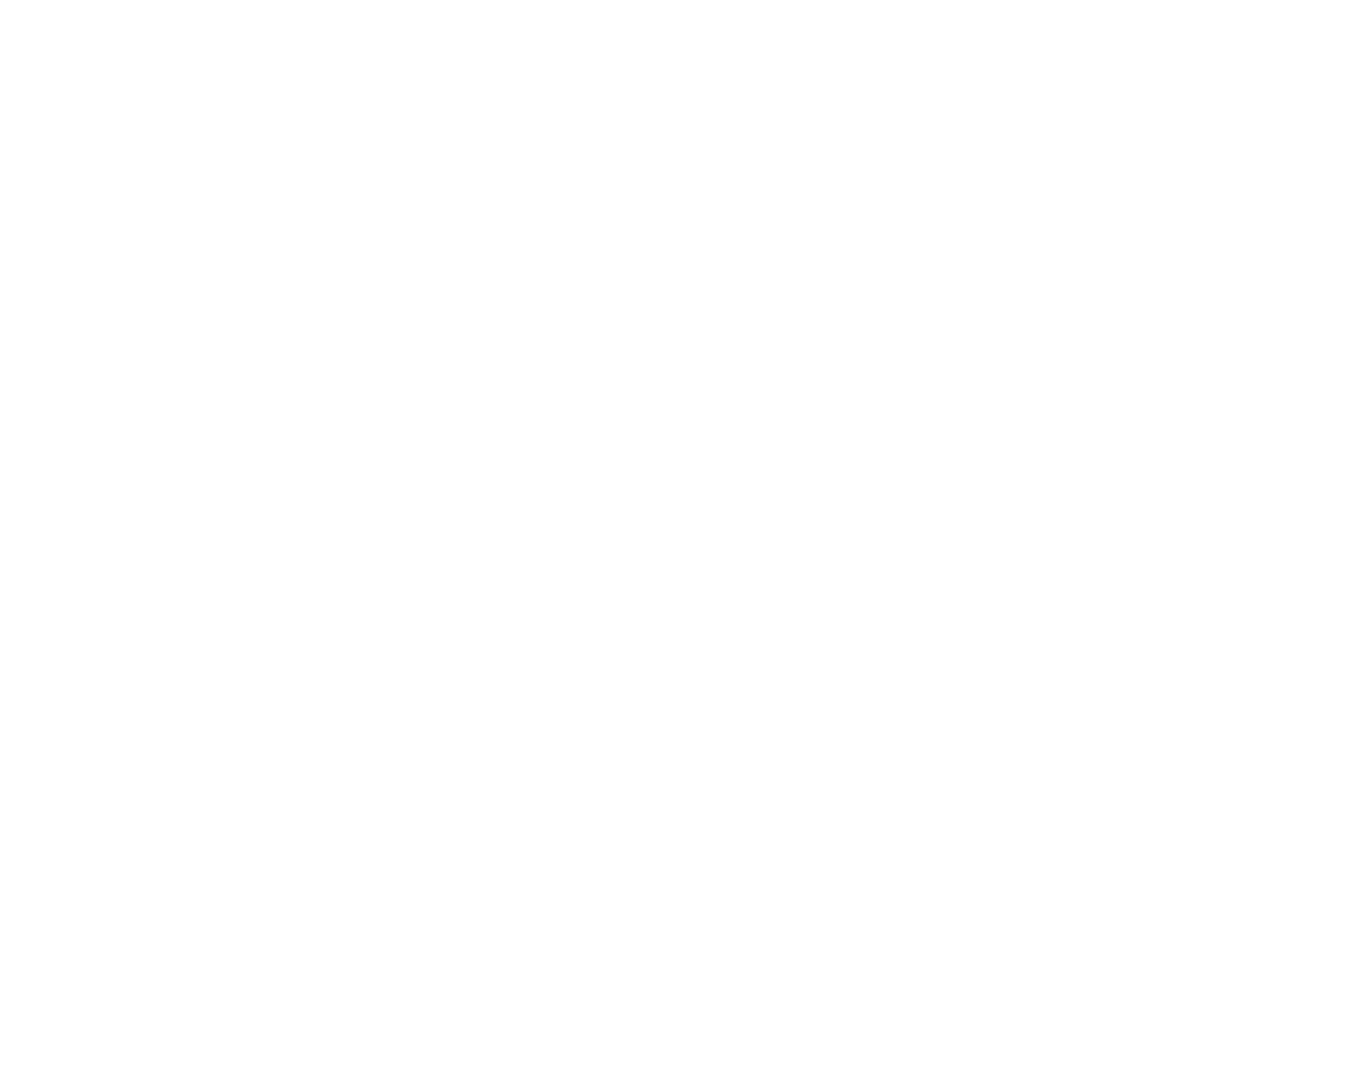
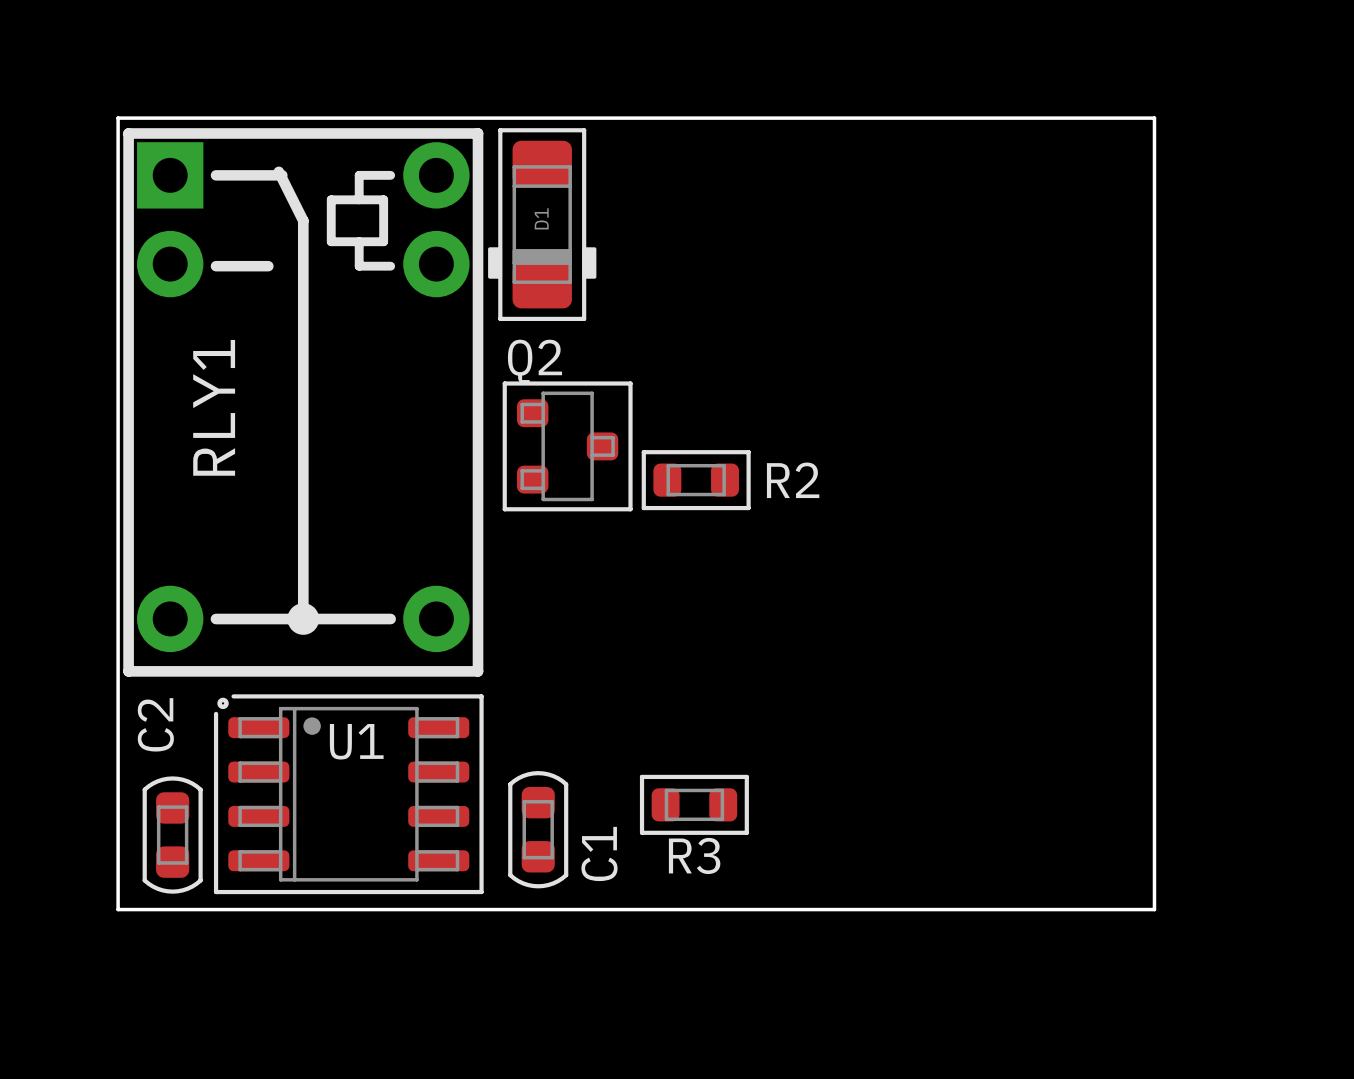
board edge: none -> (118, 118) (1154, 118) (1154, 909) (118, 909) (118, 118)
D1: none -> (542, 224)
RLY1: none -> (303, 402)
Q2: none -> (567, 446)
R2: none -> (696, 480)
U1: none -> (348, 794)
R3: none -> (694, 804)
C1: none -> (538, 829)
C2: none -> (172, 835)

